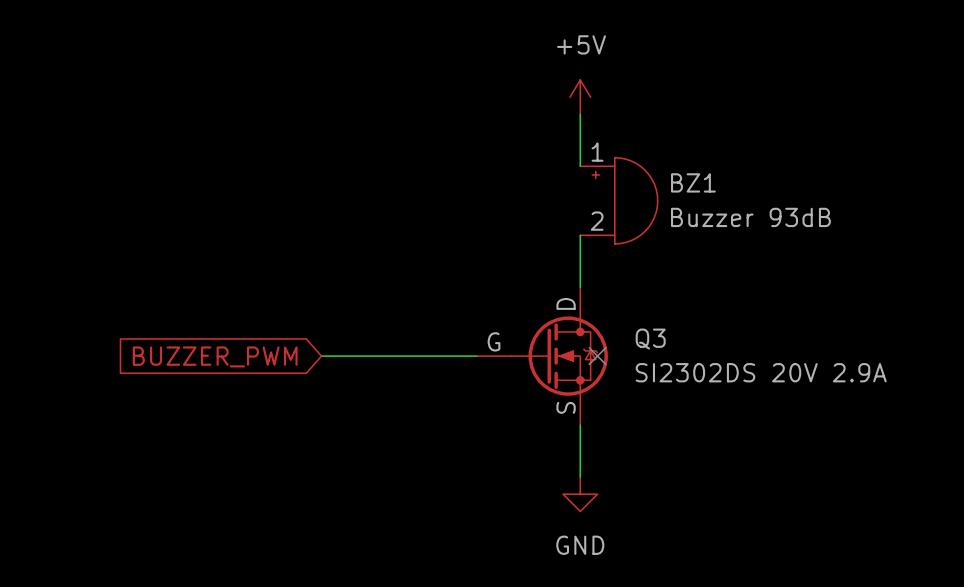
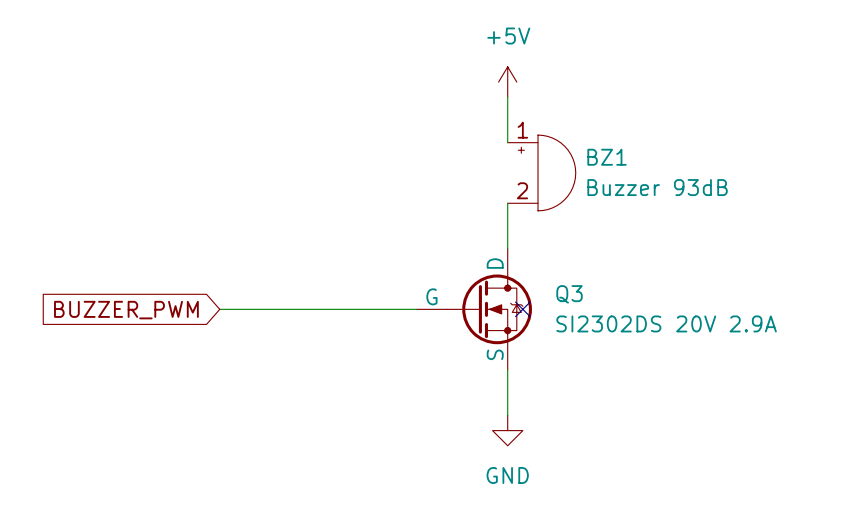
global label position: BUZZER_PWM (215, 356) -> BUZZER_PWM (126, 310)
wire: none -> (219, 309) (280, 309)

